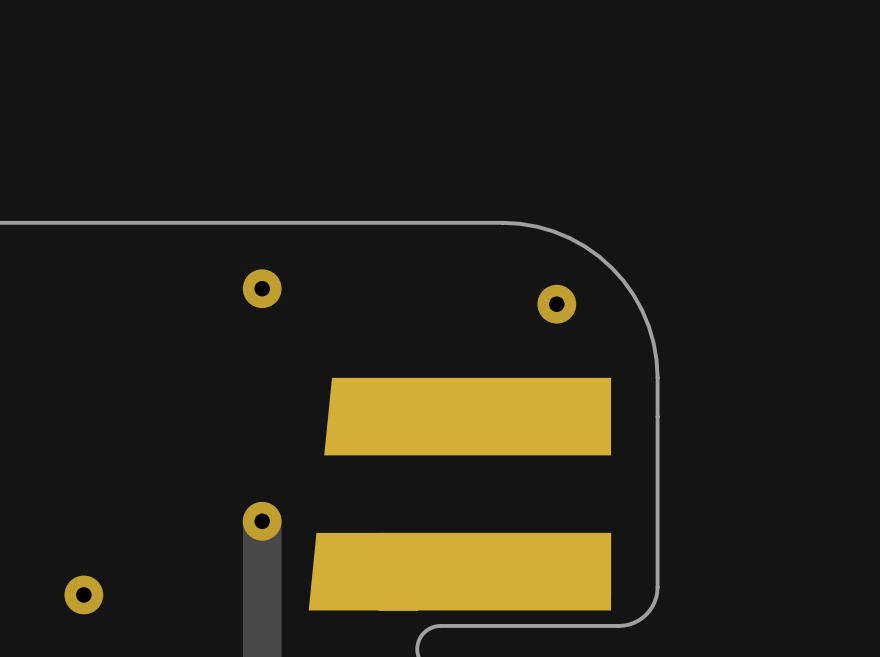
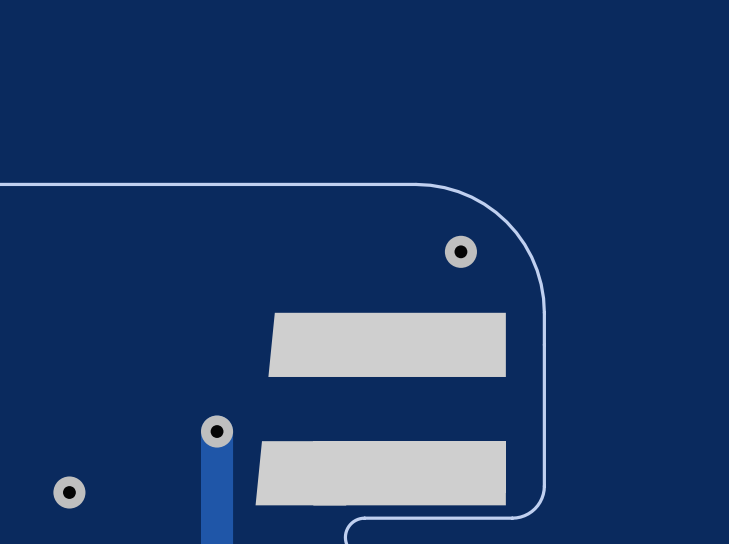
via: (262, 288) -> none

